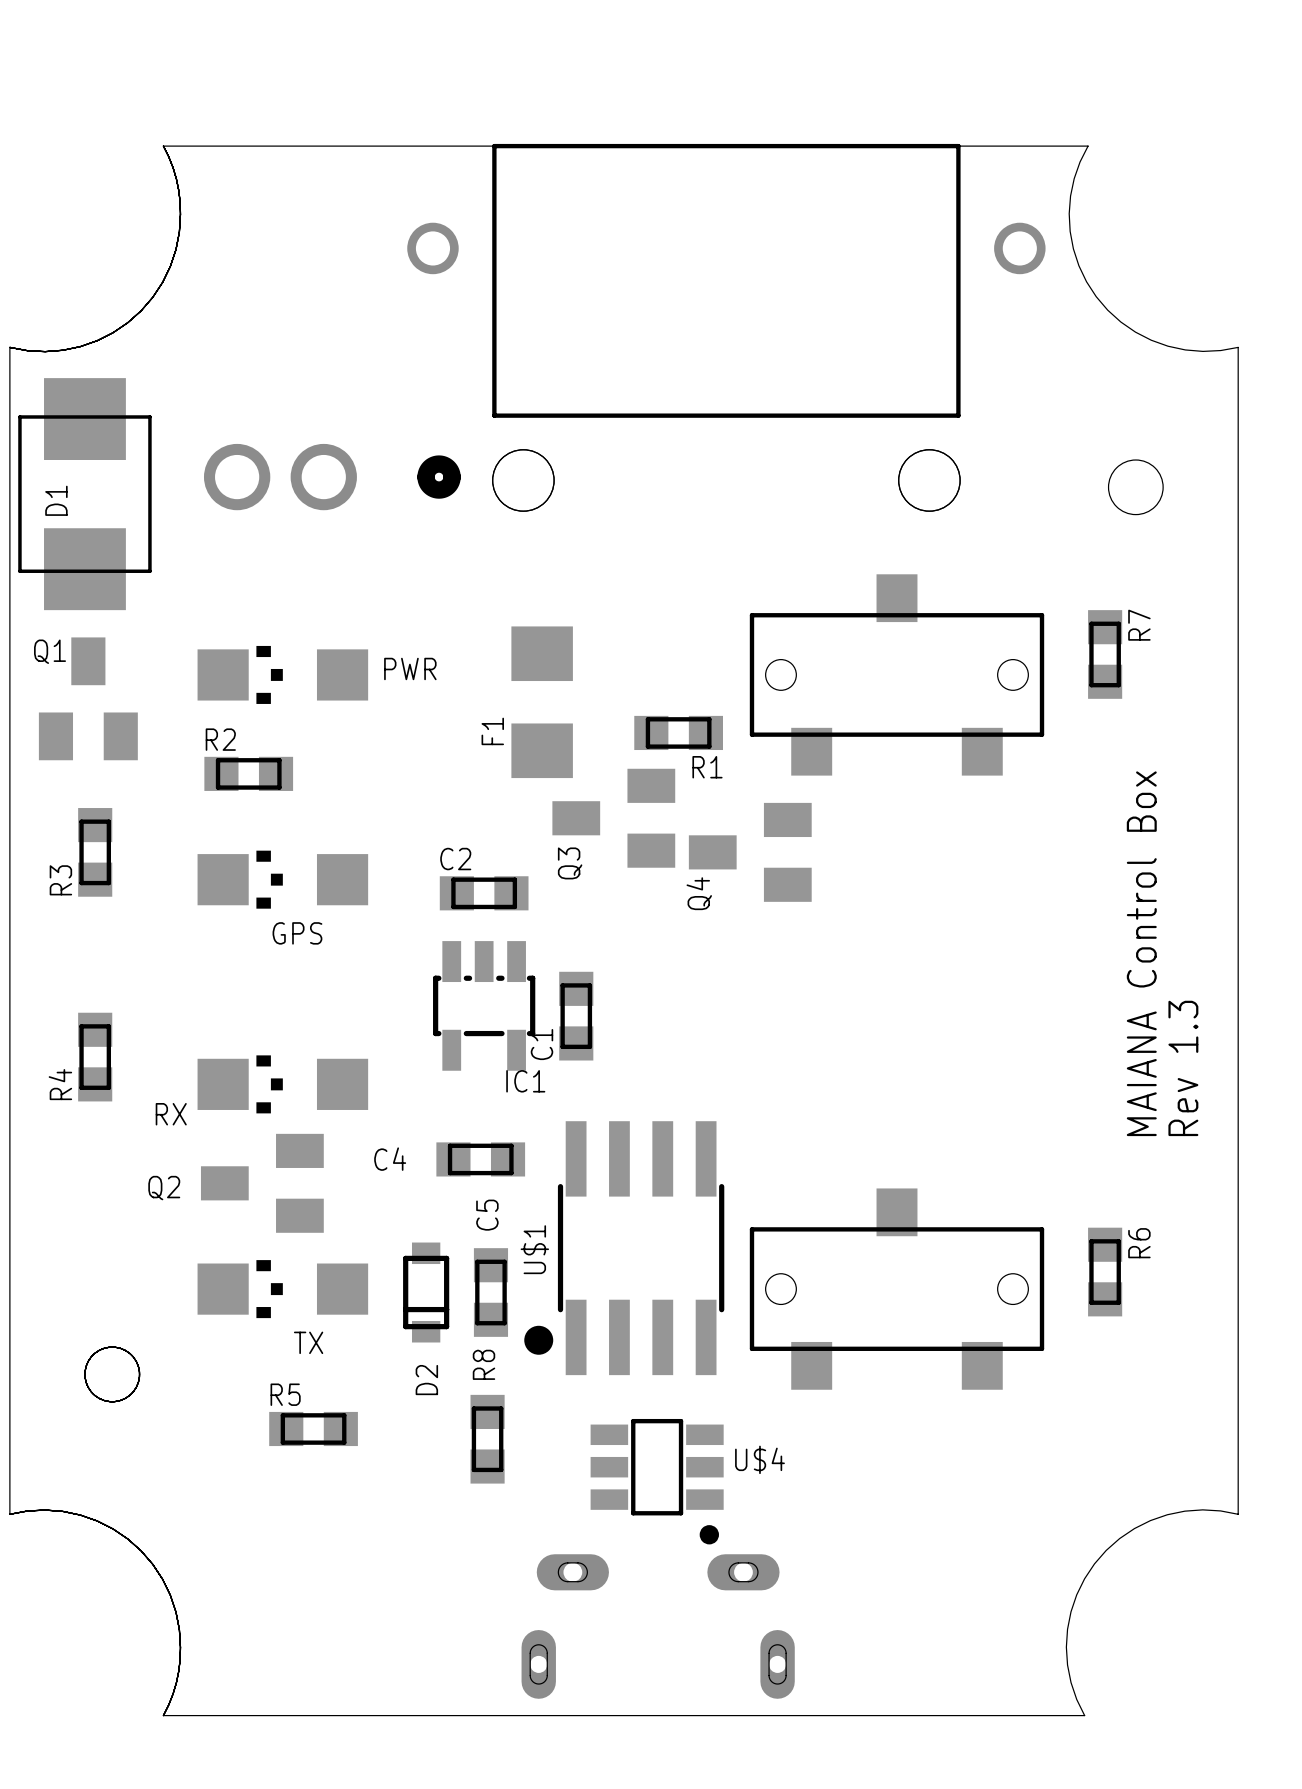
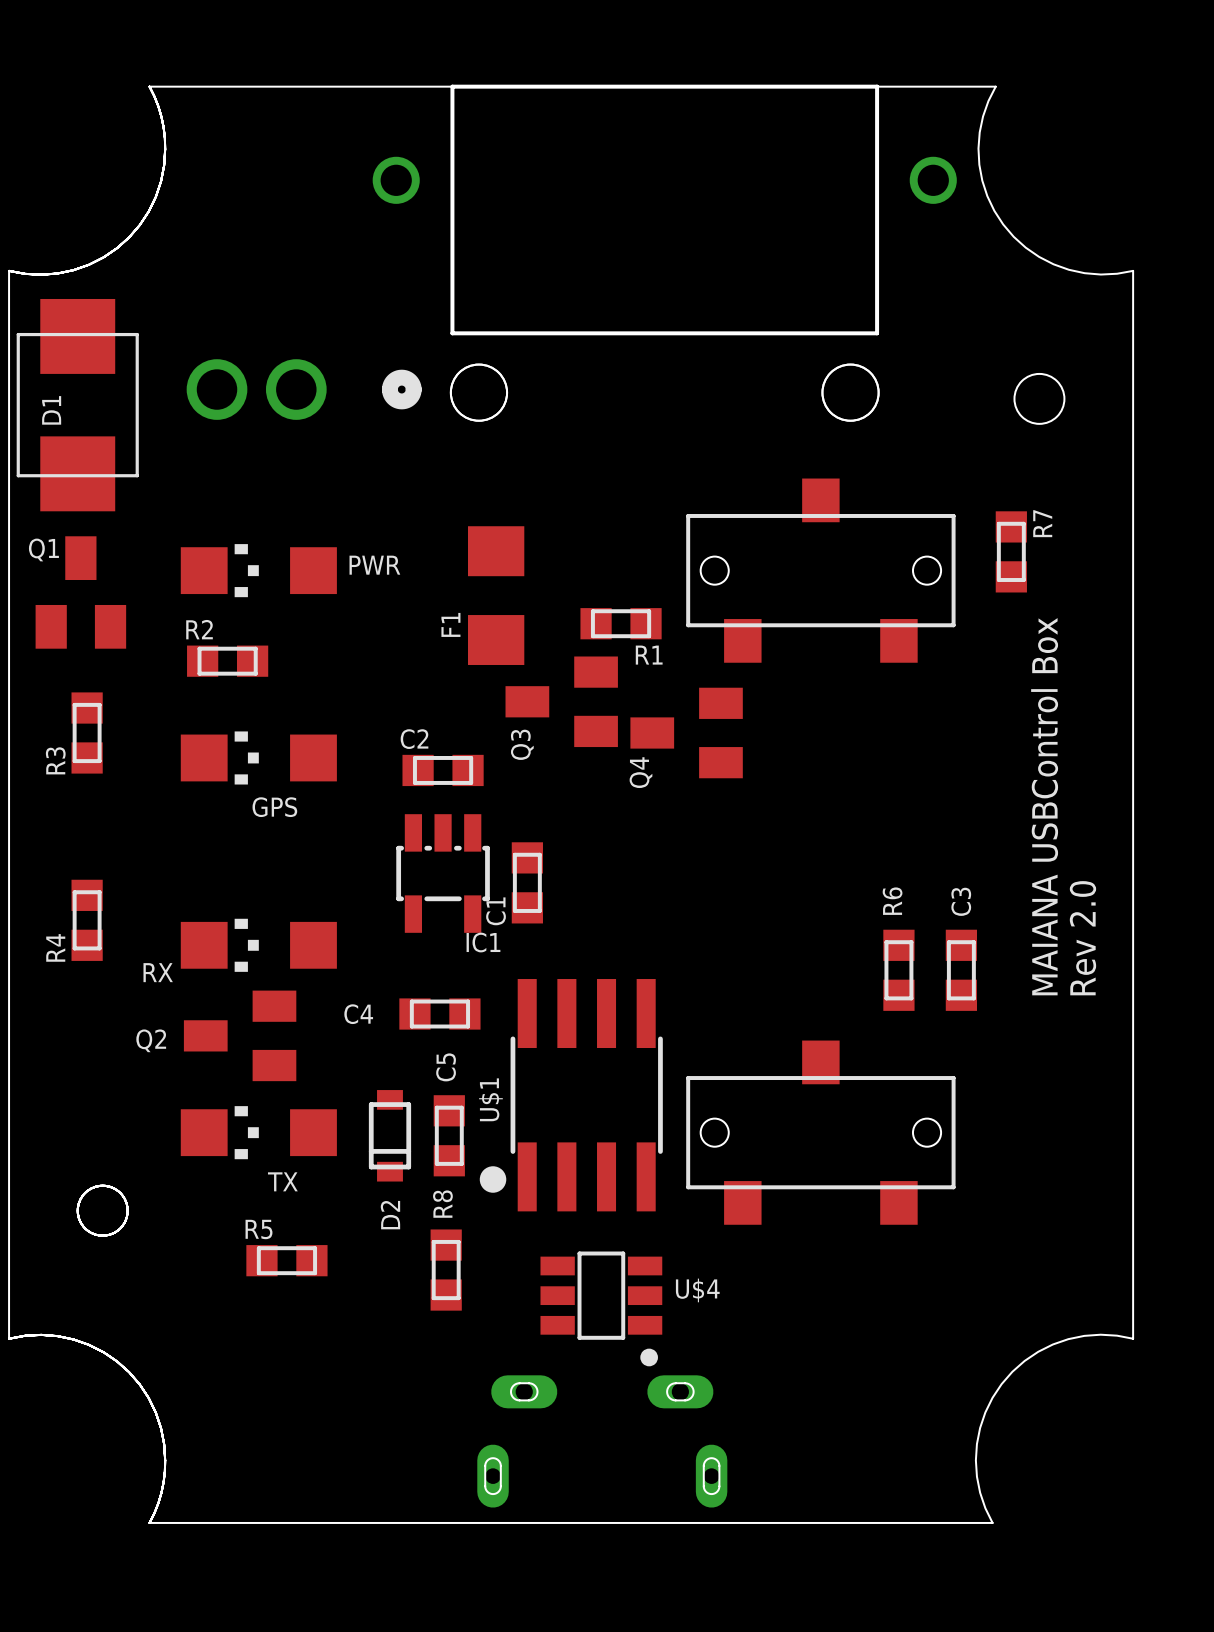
text: MAIANA Control Box (1141, 953) -> MAIANA USBControl Box (1044, 806)
text: Rev 1.3 (1183, 1068) -> Rev 2.0 (1082, 938)
C3: none -> (961, 970)
R6 name position: R6 (1139, 1243) -> R6 (892, 901)
R6 position: (1105, 1272) -> (898, 970)

